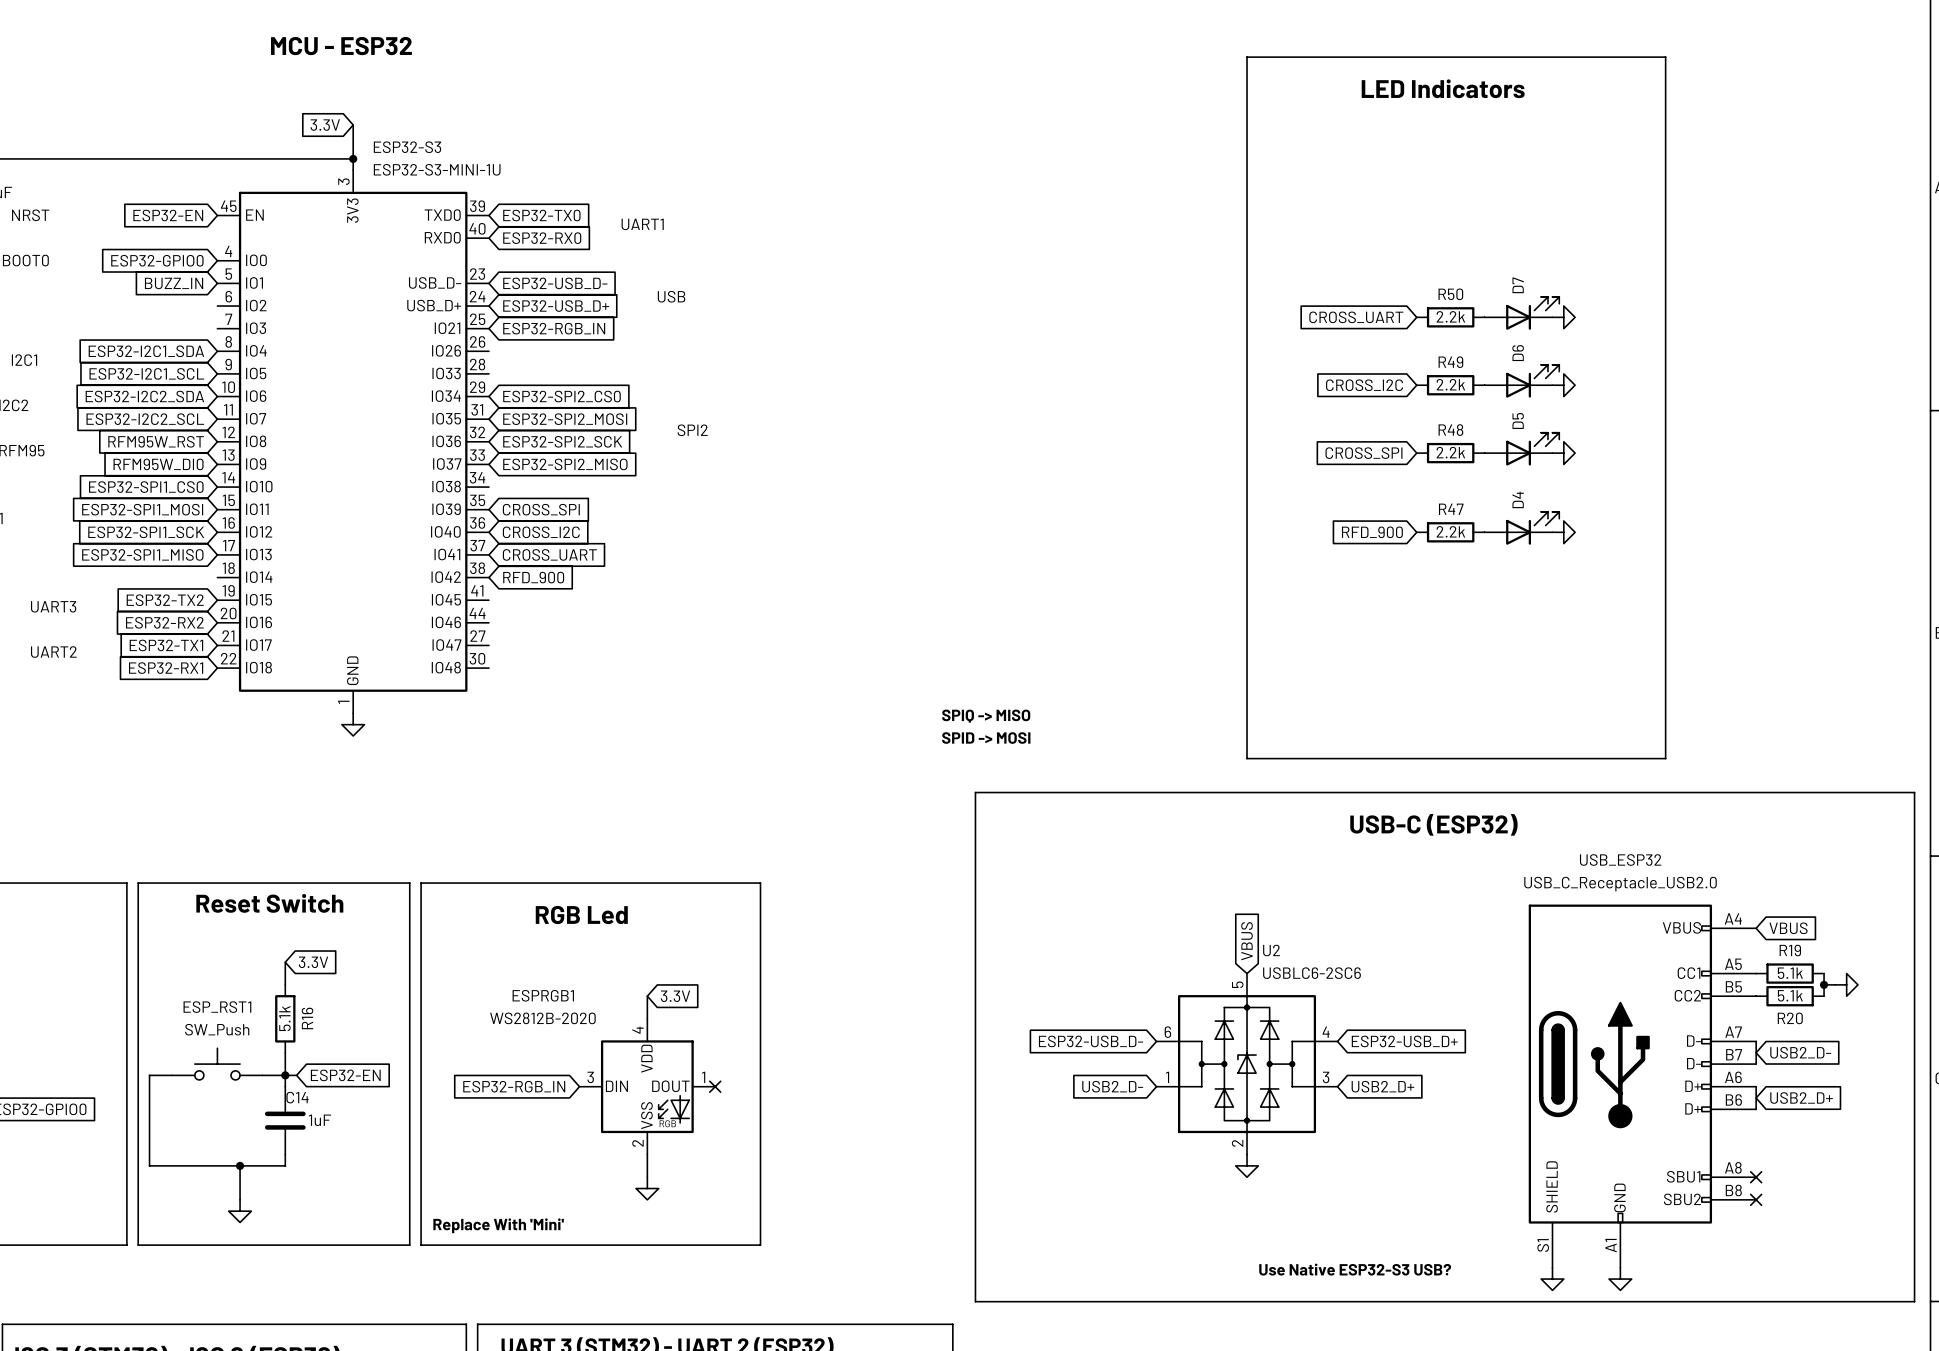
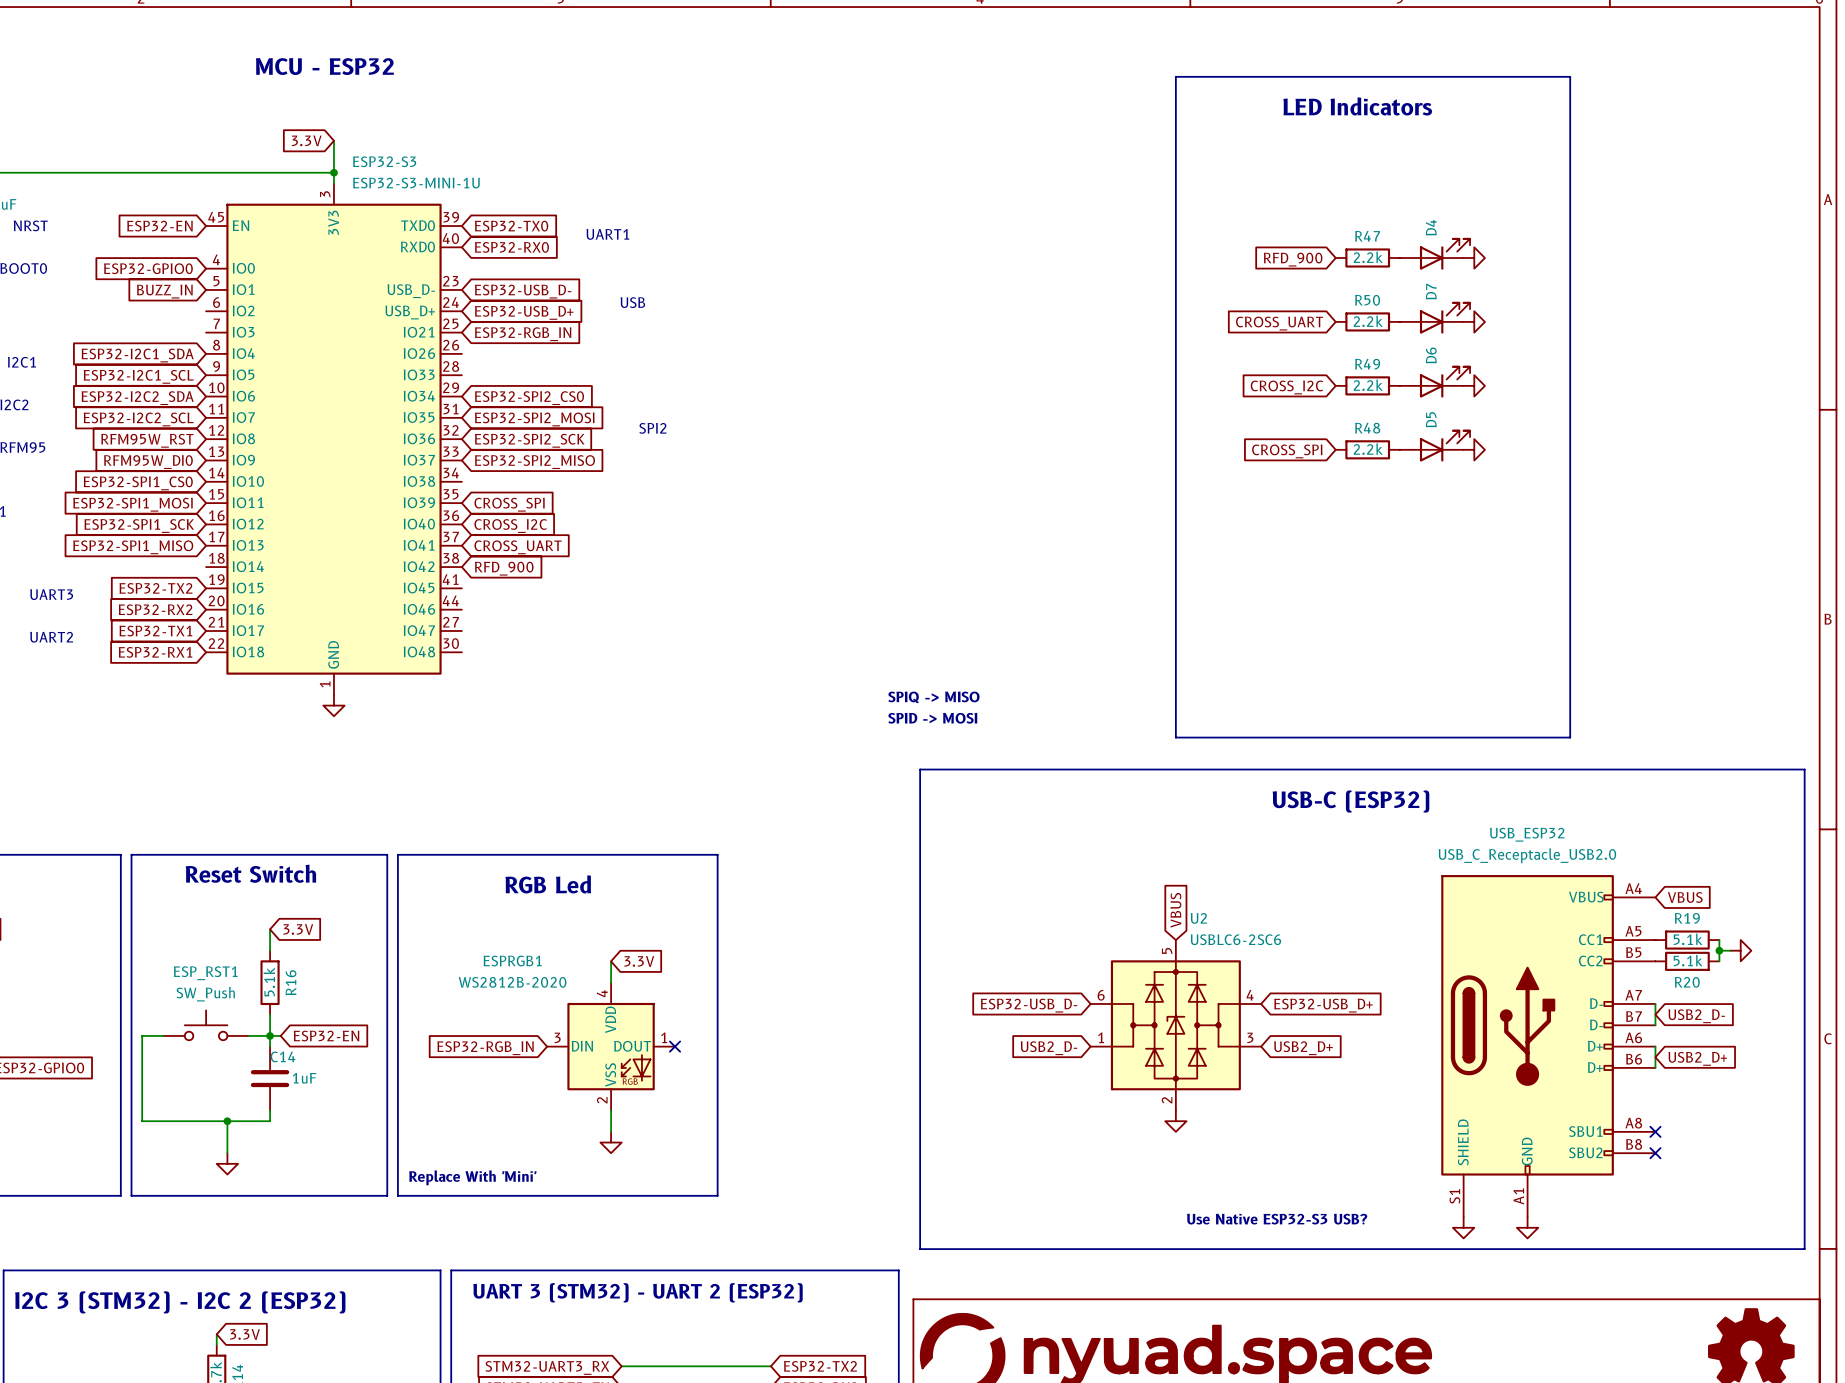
global label: none -> RFD_900 (1293, 259)
power symbol: none -> (1474, 258)
D4 position: (1521, 528) -> (1434, 254)
global label: RFD_900 (1372, 532) -> none
R47 position: (1450, 532) -> (1367, 258)
power symbol: (1563, 532) -> none

